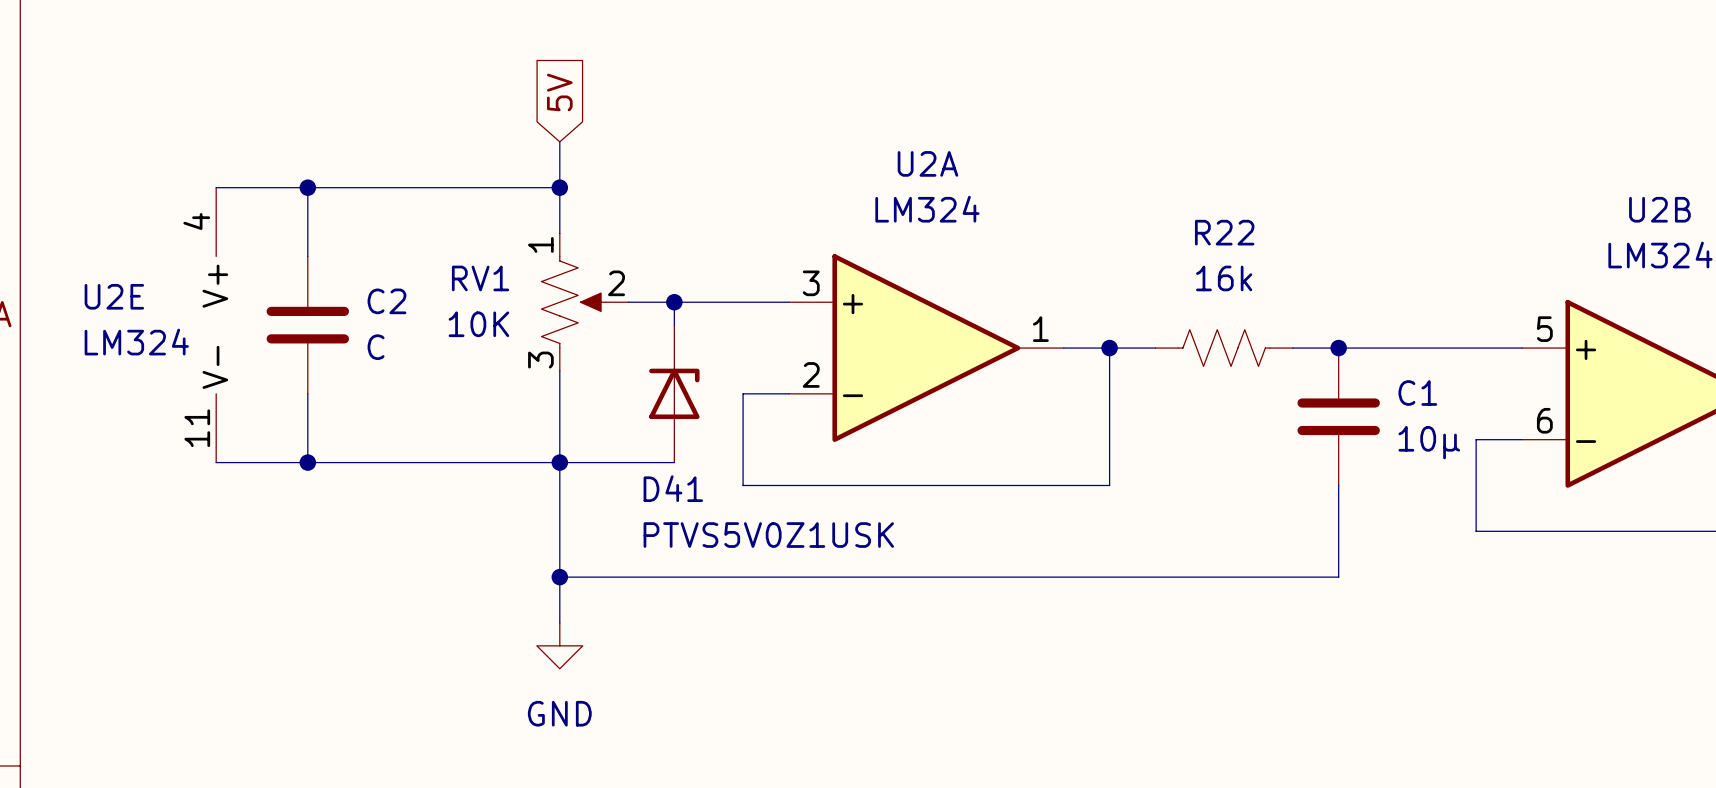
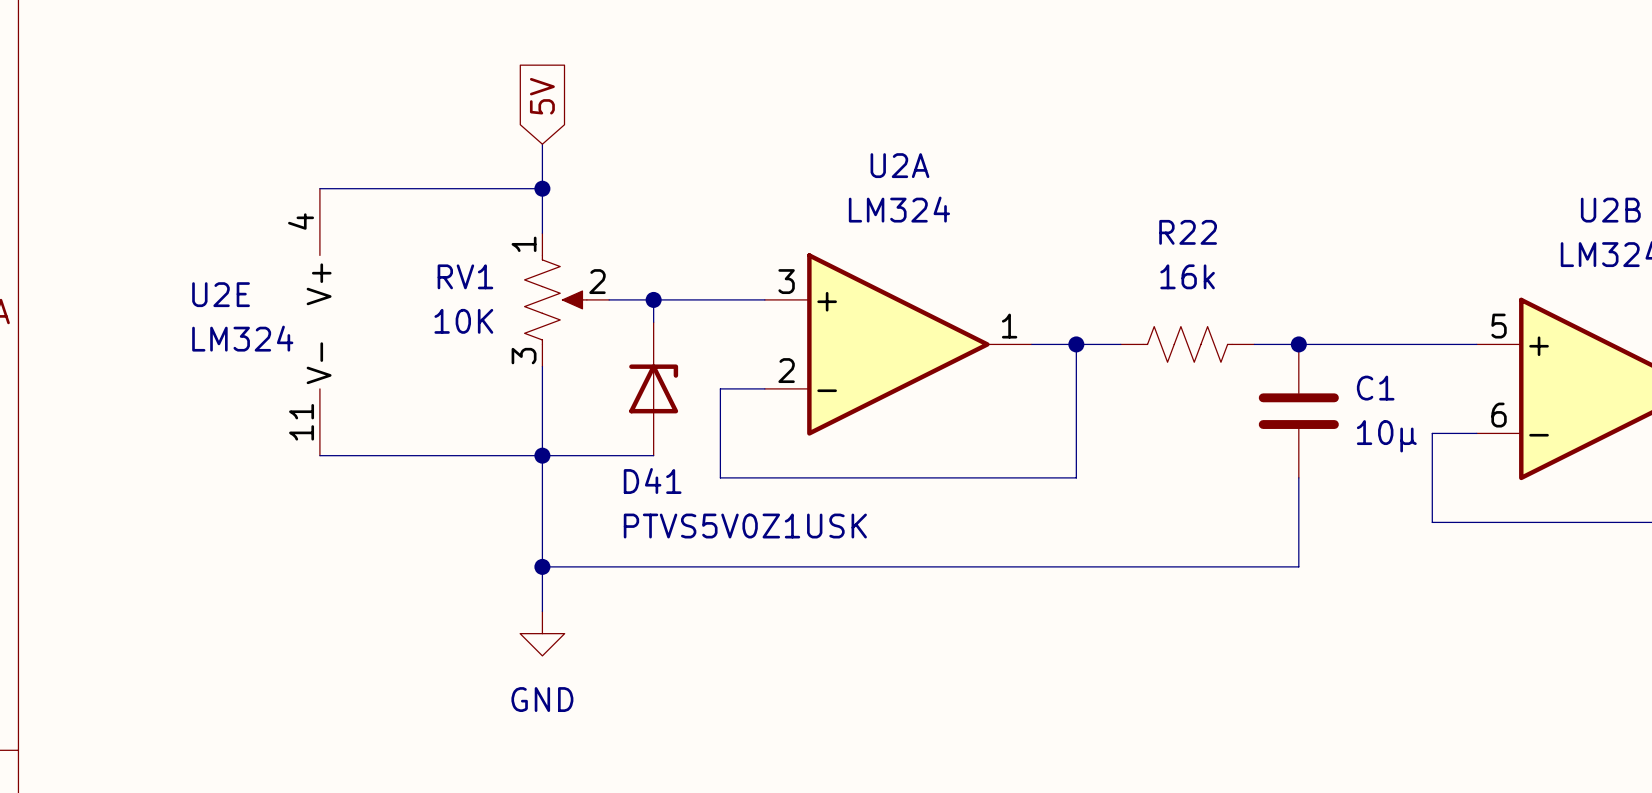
wire: (216, 187) (330, 187) -> none
wire: (307, 187) (307, 256) -> none
junction: (307, 187) -> none
U2E position: (216, 325) -> (319, 322)
C2: C (307, 325) -> none
wire: (307, 393) (307, 462) -> none
wire: (216, 462) (330, 462) -> none
junction: (307, 462) -> none

